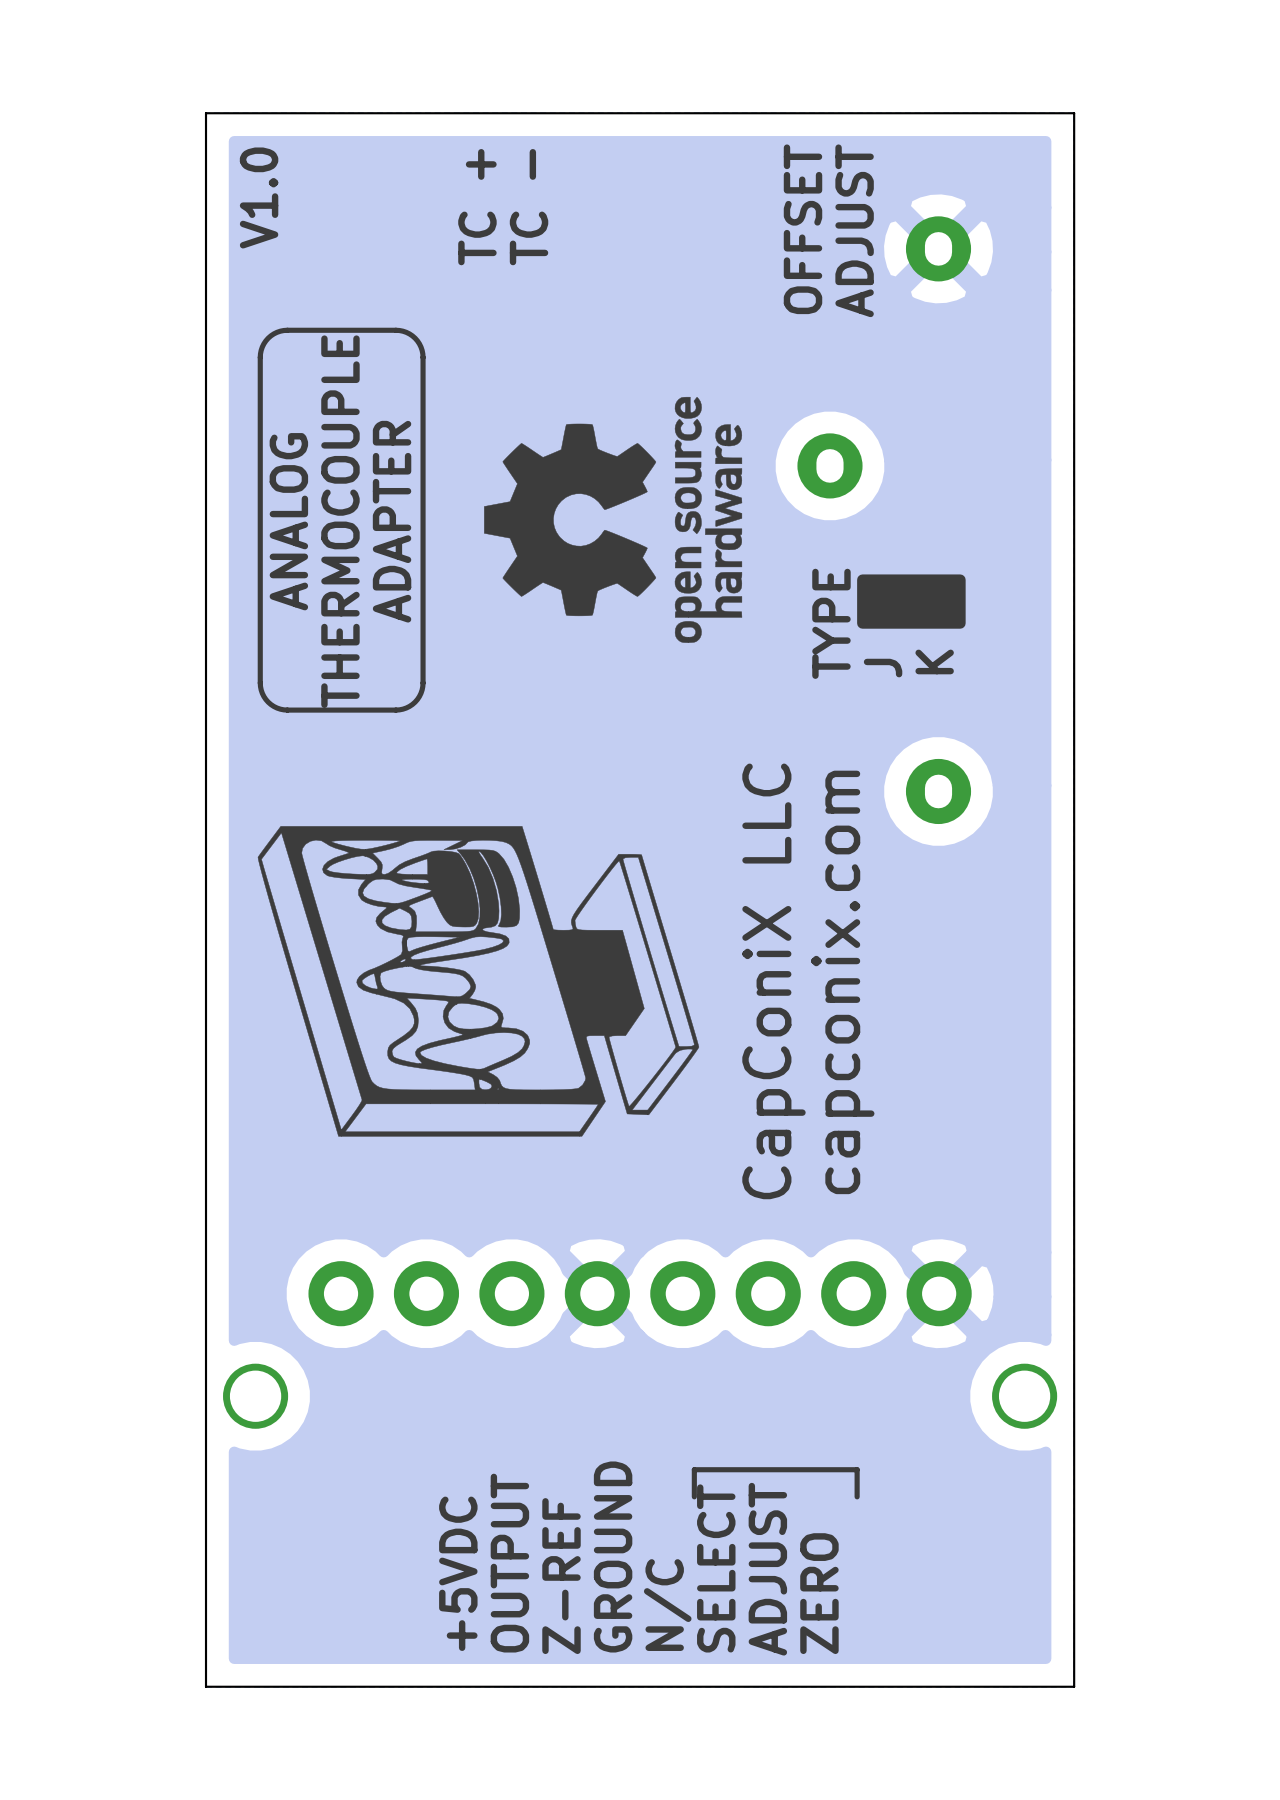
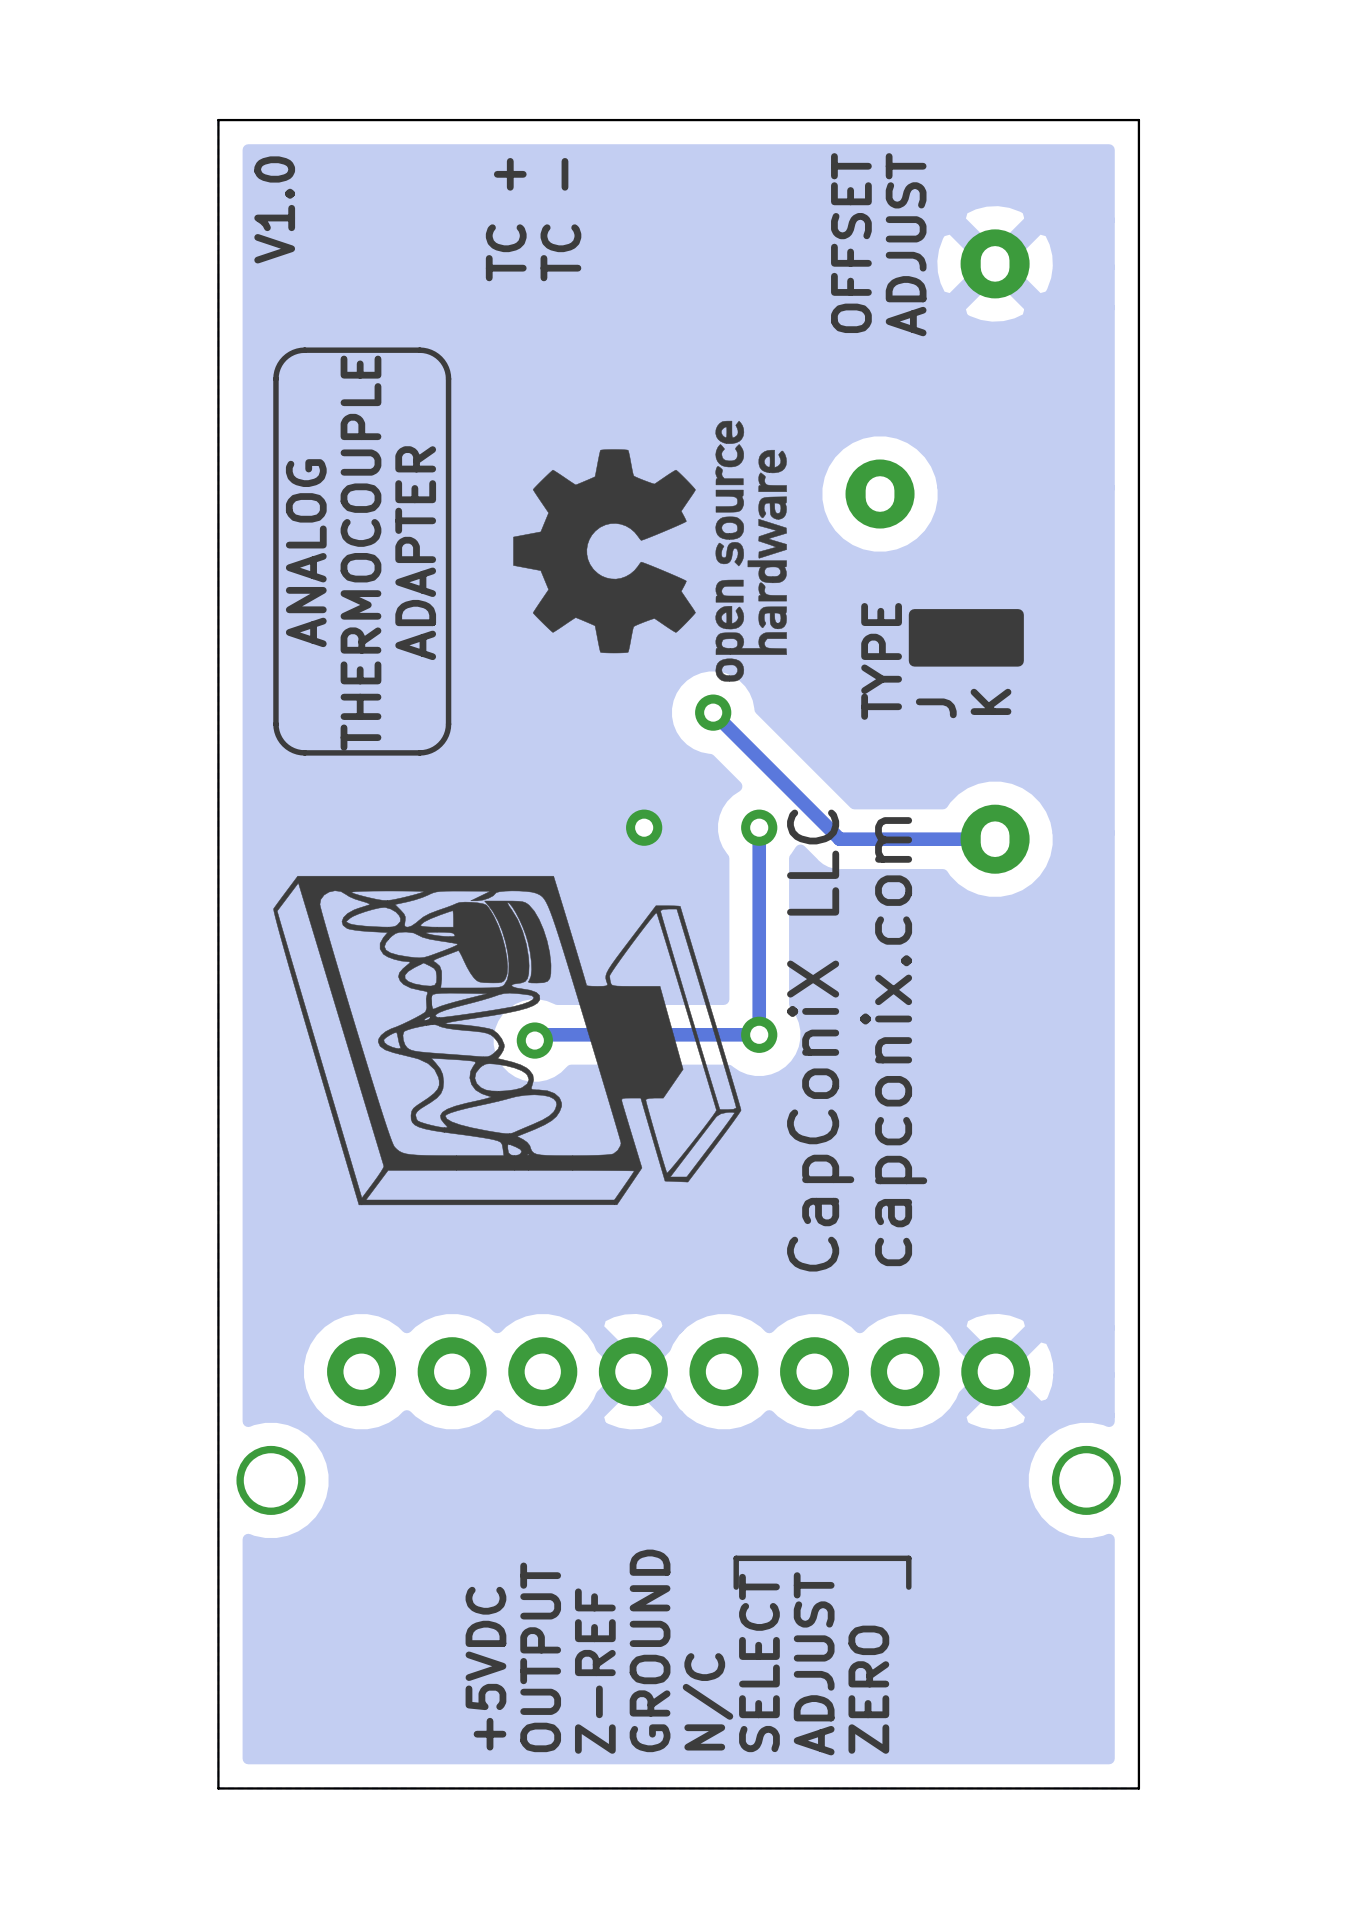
track: none -> (713, 712) (839, 839) (995, 839)
via: none -> (713, 712)
via: none -> (644, 827)
track: none -> (759, 827) (759, 1034) (540, 1034) (534, 1040)
via: none -> (759, 827)
via: none -> (759, 1034)
via: none -> (534, 1040)

